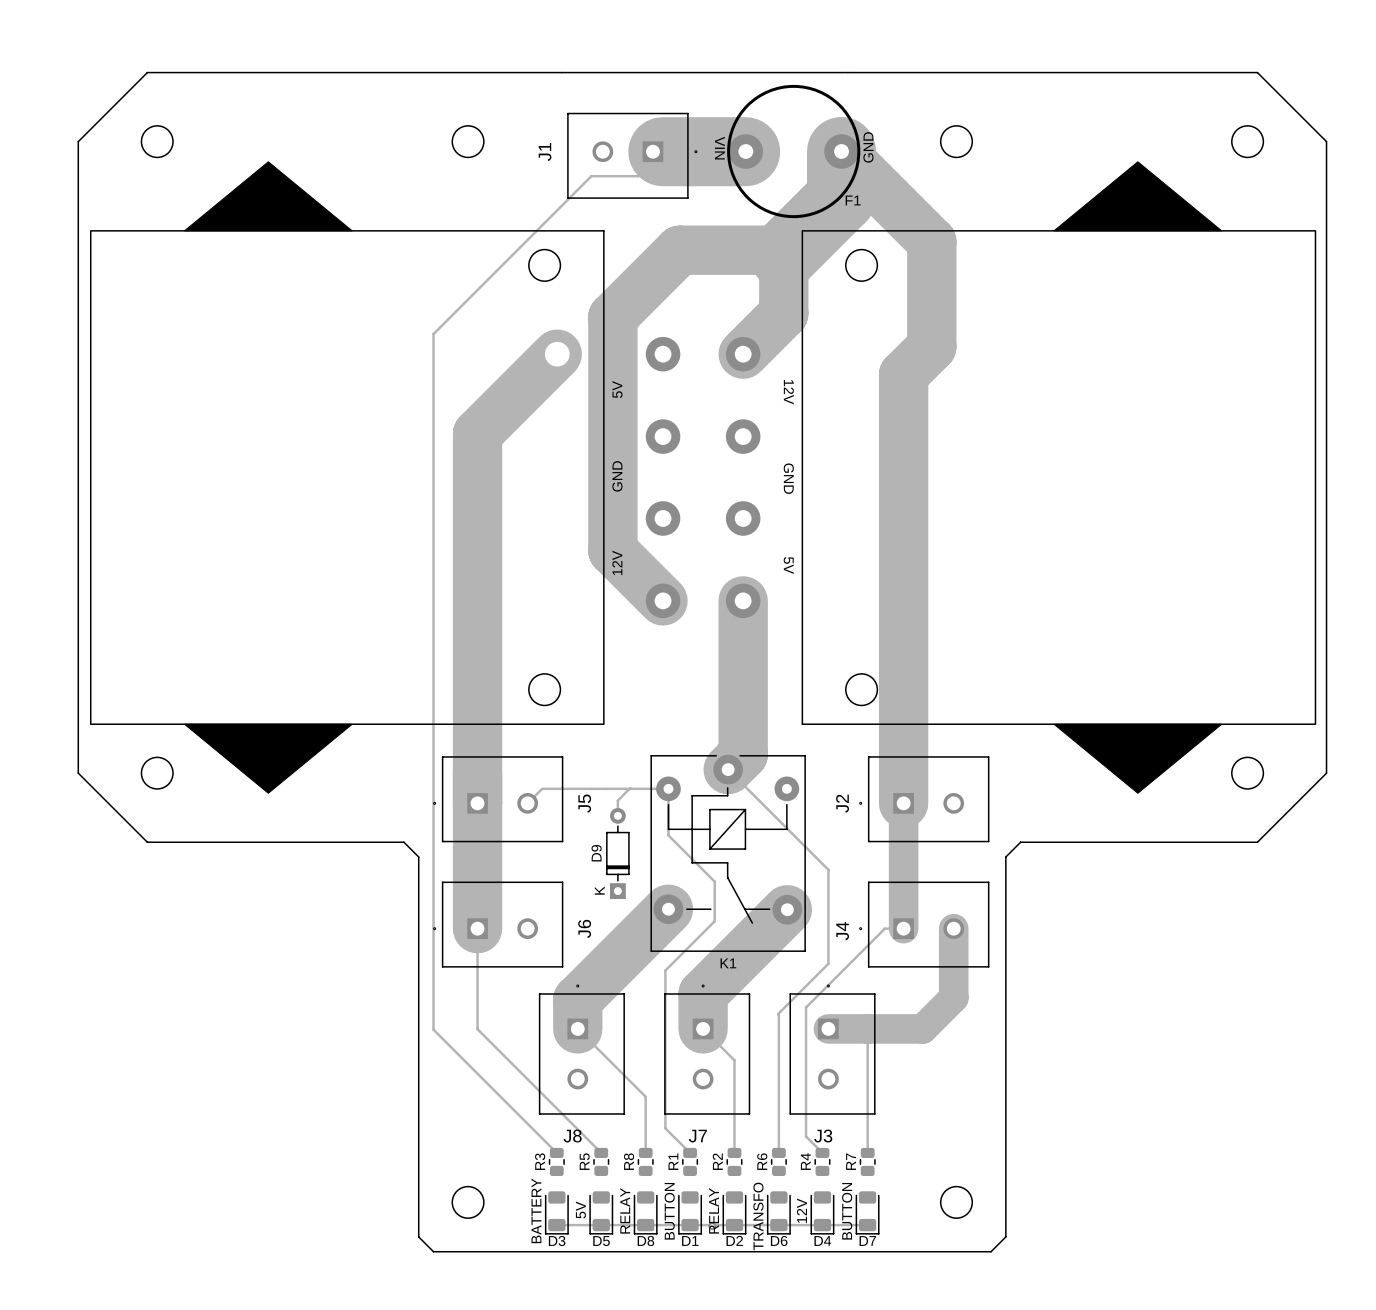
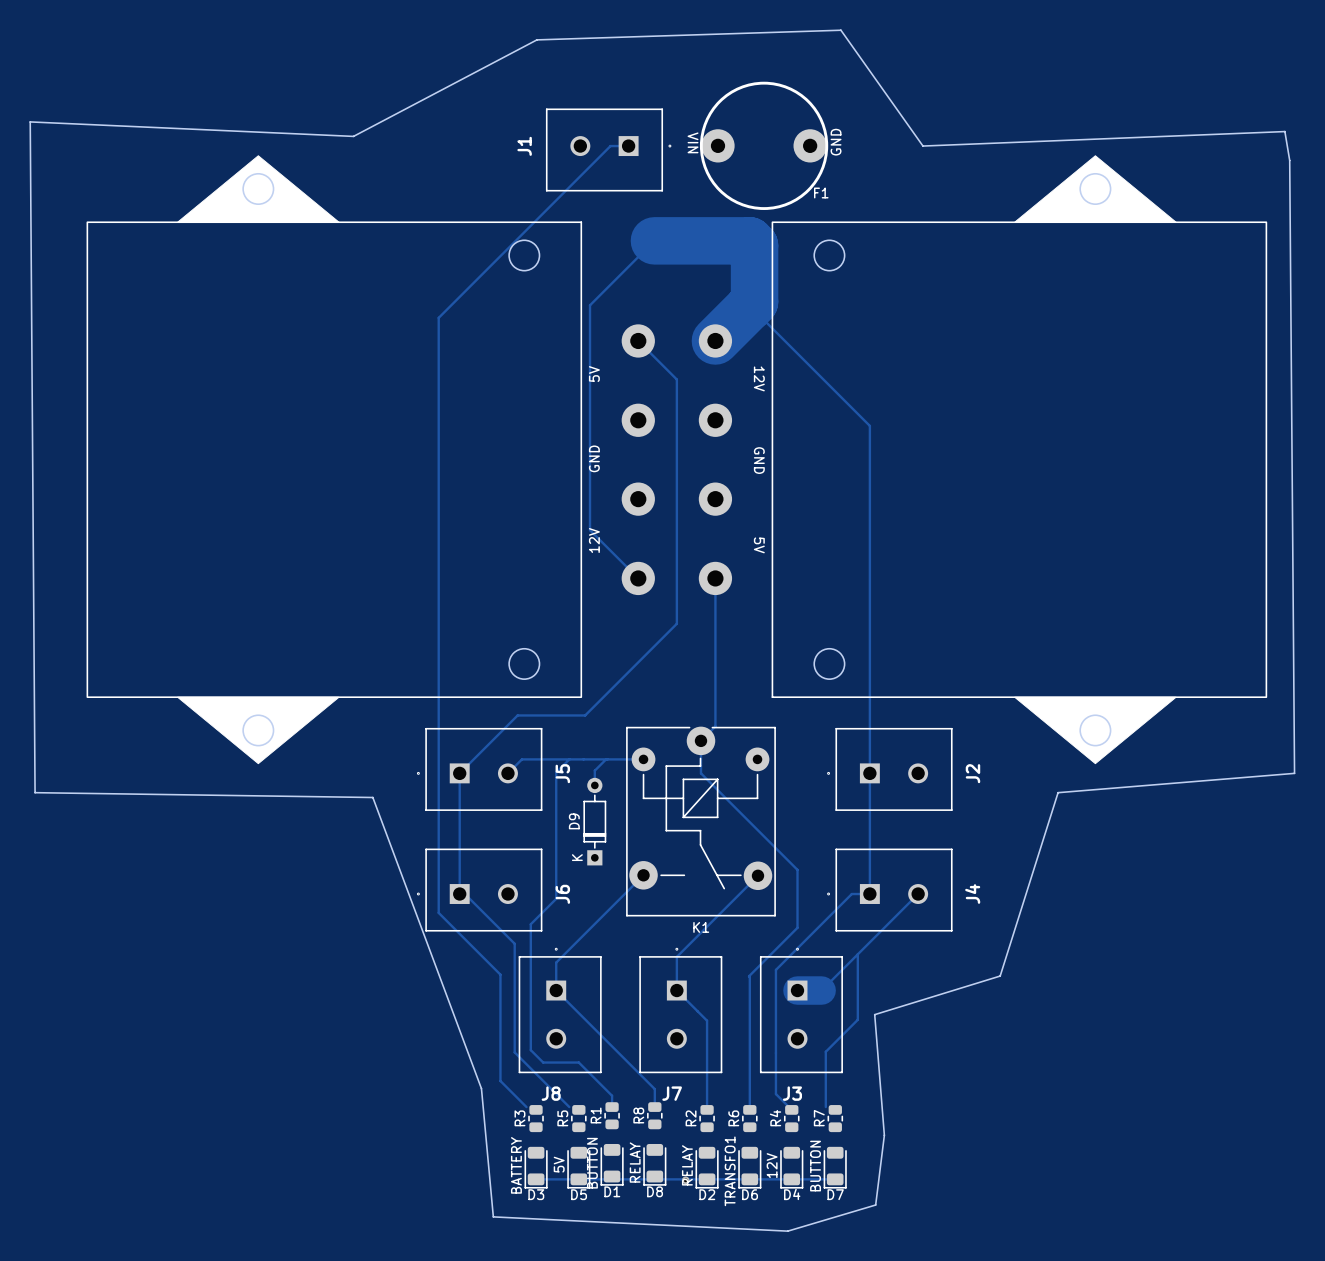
board edge: (147, 72) (78, 141) (78, 773) (147, 842) (403, 842) (418, 857) (418, 1236) (433, 1251) (991, 1251) (1005, 1236) (1005, 857) (1020, 842) (1257, 842) (1326, 773) (1326, 141) (1257, 72) (147, 72) -> (840, 30) (536, 39) (353, 136) (30, 121) (35, 792) (372, 797) (481, 1088) (493, 1216) (787, 1231) (875, 1205) (884, 1135) (874, 1014) (1000, 976) (1058, 792) (1294, 773) (1289, 160) (1284, 131) (922, 146) (840, 30)
round board edge: [140, 125, 174, 158] -> none
round board edge: [451, 125, 485, 158] -> none
round board edge: [940, 125, 973, 158] -> none
round board edge: [1231, 125, 1264, 158] -> none
track: (745, 138) (745, 151) (662, 151) (638, 176) (591, 176) (433, 334) (433, 1029) (556, 1152) -> none
track: none -> (610, 146) (438, 317) (438, 912) (500, 974) (500, 1081) (526, 1107)
track: (814, 224) (783, 255) (841, 197) (841, 151) (931, 241) (931, 346) (903, 374) (903, 442) -> (749, 305) (869, 425)
track width: thick (679, 250) (612, 317) (612, 550) (663, 600) -> thin (654, 240) (590, 305) (590, 530) (638, 578)
track: (557, 354) (477, 433) (477, 803) -> (638, 340) (676, 379) (676, 623) (585, 715) (517, 715) (459, 773)
via: (557, 354) -> none
track width: thick (903, 442) (903, 928) -> thin (869, 425) (869, 894)
track width: thick (743, 600) (743, 754) (728, 769) -> thin (715, 578) (715, 726) (700, 740)
round board edge: [140, 756, 174, 790] -> none
round board edge: [1231, 756, 1264, 790] -> none
track: (728, 769) (828, 869) (828, 903) -> (700, 740) (700, 773) (797, 869)
track: none -> (569, 759) (556, 772) (556, 898) (530, 924) (530, 1050) (543, 1062) (578, 1062) (612, 1095) (612, 1107)
track: (668, 788) (668, 835) (714, 881) (714, 921) (665, 970) (665, 1128) (675, 1138) -> none
track width: thick (477, 803) (477, 928) -> thin (459, 773) (459, 894)
J2 name position: J2 (842, 803) -> J2 (972, 773)
track width: thick (668, 909) (577, 999) (577, 1028) -> thin (643, 875) (556, 962) (556, 990)
track width: thick (787, 909) (703, 993) (703, 1028) -> thin (757, 875) (676, 956) (676, 990)
track: (477, 928) (477, 1029) (601, 1152) -> (459, 894) (464, 894) (514, 943) (514, 1052) (569, 1107)
track: (953, 928) (953, 997) (922, 1028) (853, 1028) -> (918, 894) (821, 990)
J4 name position: J4 (842, 931) -> J4 (972, 894)
track: none -> (857, 954) (857, 1019) (825, 1051) (825, 1107)
track: (867, 1028) (867, 1152) -> none
track: (645, 1096) (645, 1152) -> (621, 1055) (654, 1089) (654, 1107)
track: (675, 1138) (690, 1152) -> none
R8 position: (645, 1161) -> (654, 1115)
R1 position: (690, 1161) -> (612, 1115)
round board edge: [451, 1186, 485, 1219] -> none
round board edge: [940, 1186, 973, 1219] -> none
D8 position: (645, 1212) -> (654, 1164)
D1 position: (690, 1212) -> (612, 1164)
D6 text: TRANSFO (758, 1216) -> TRANSFO1 (730, 1171)

